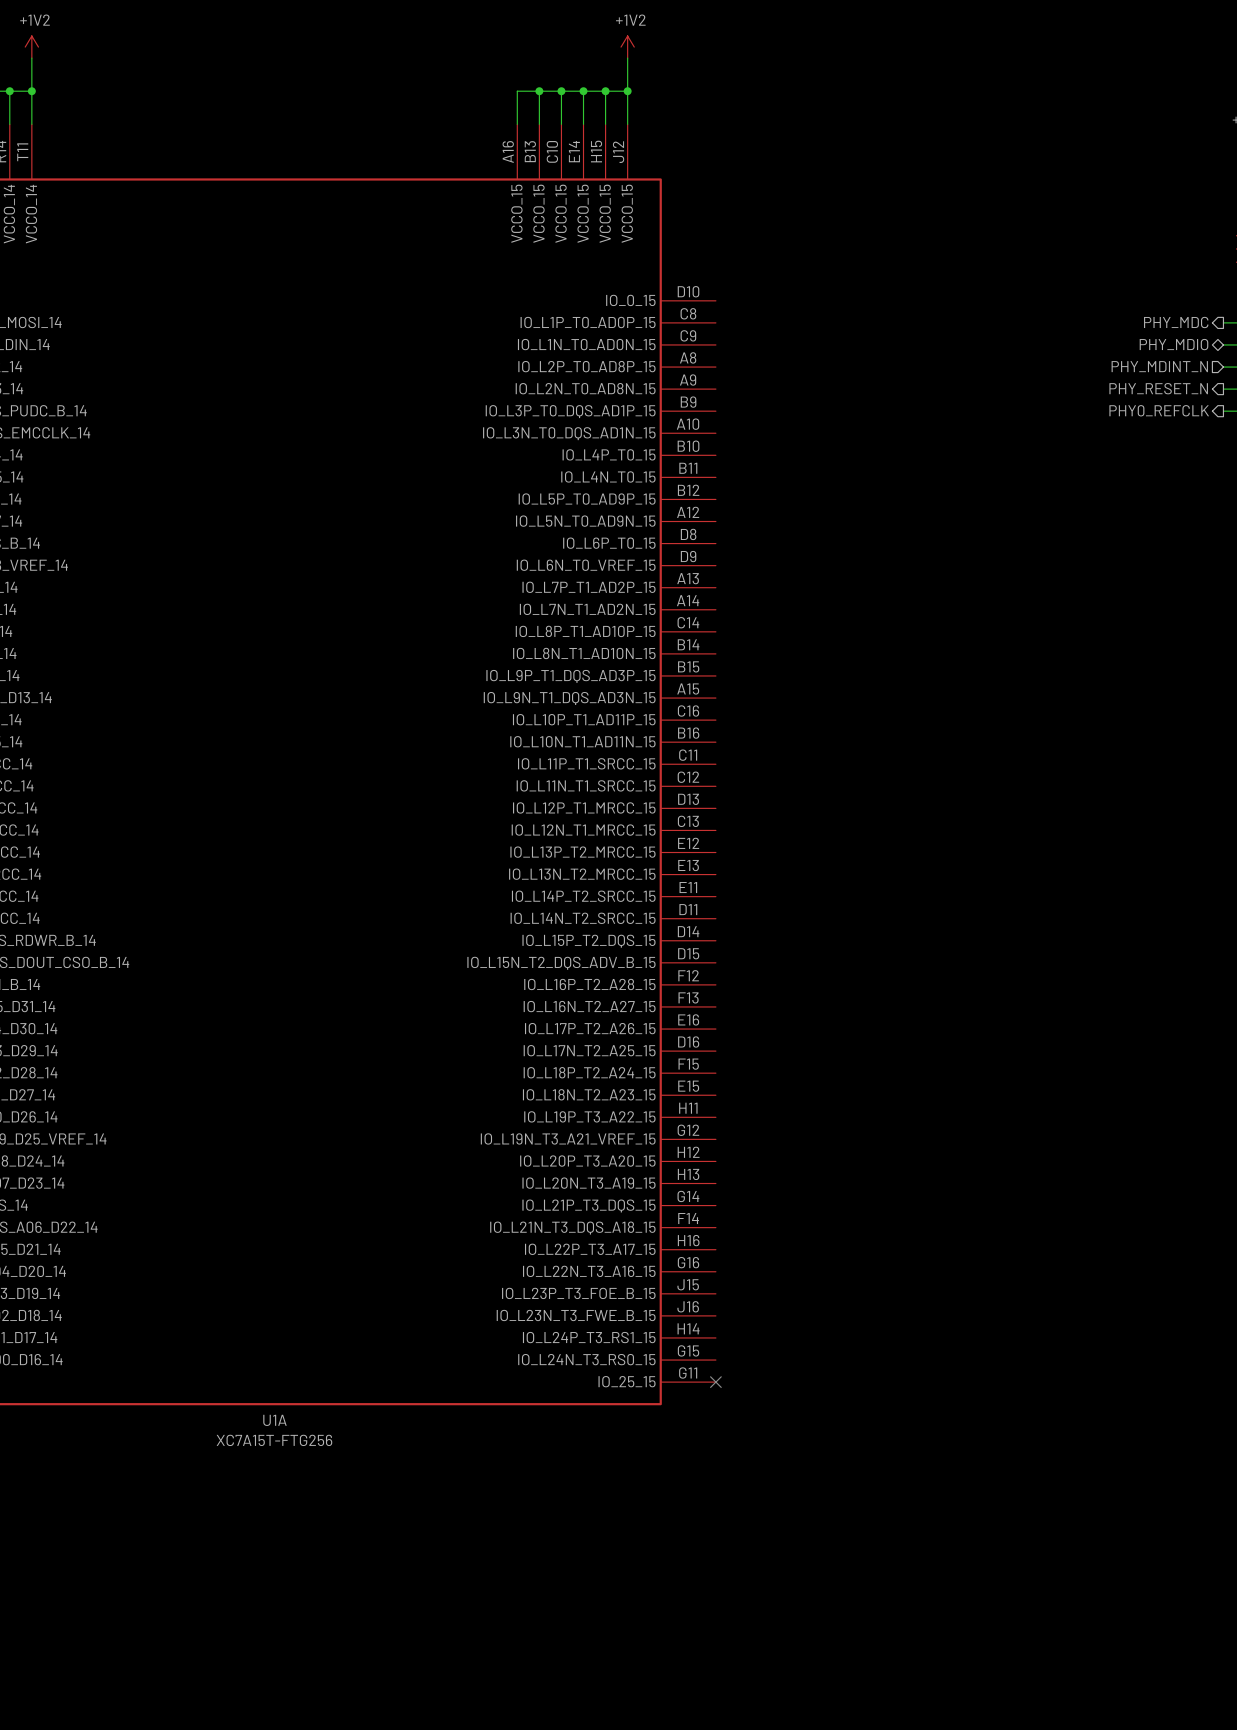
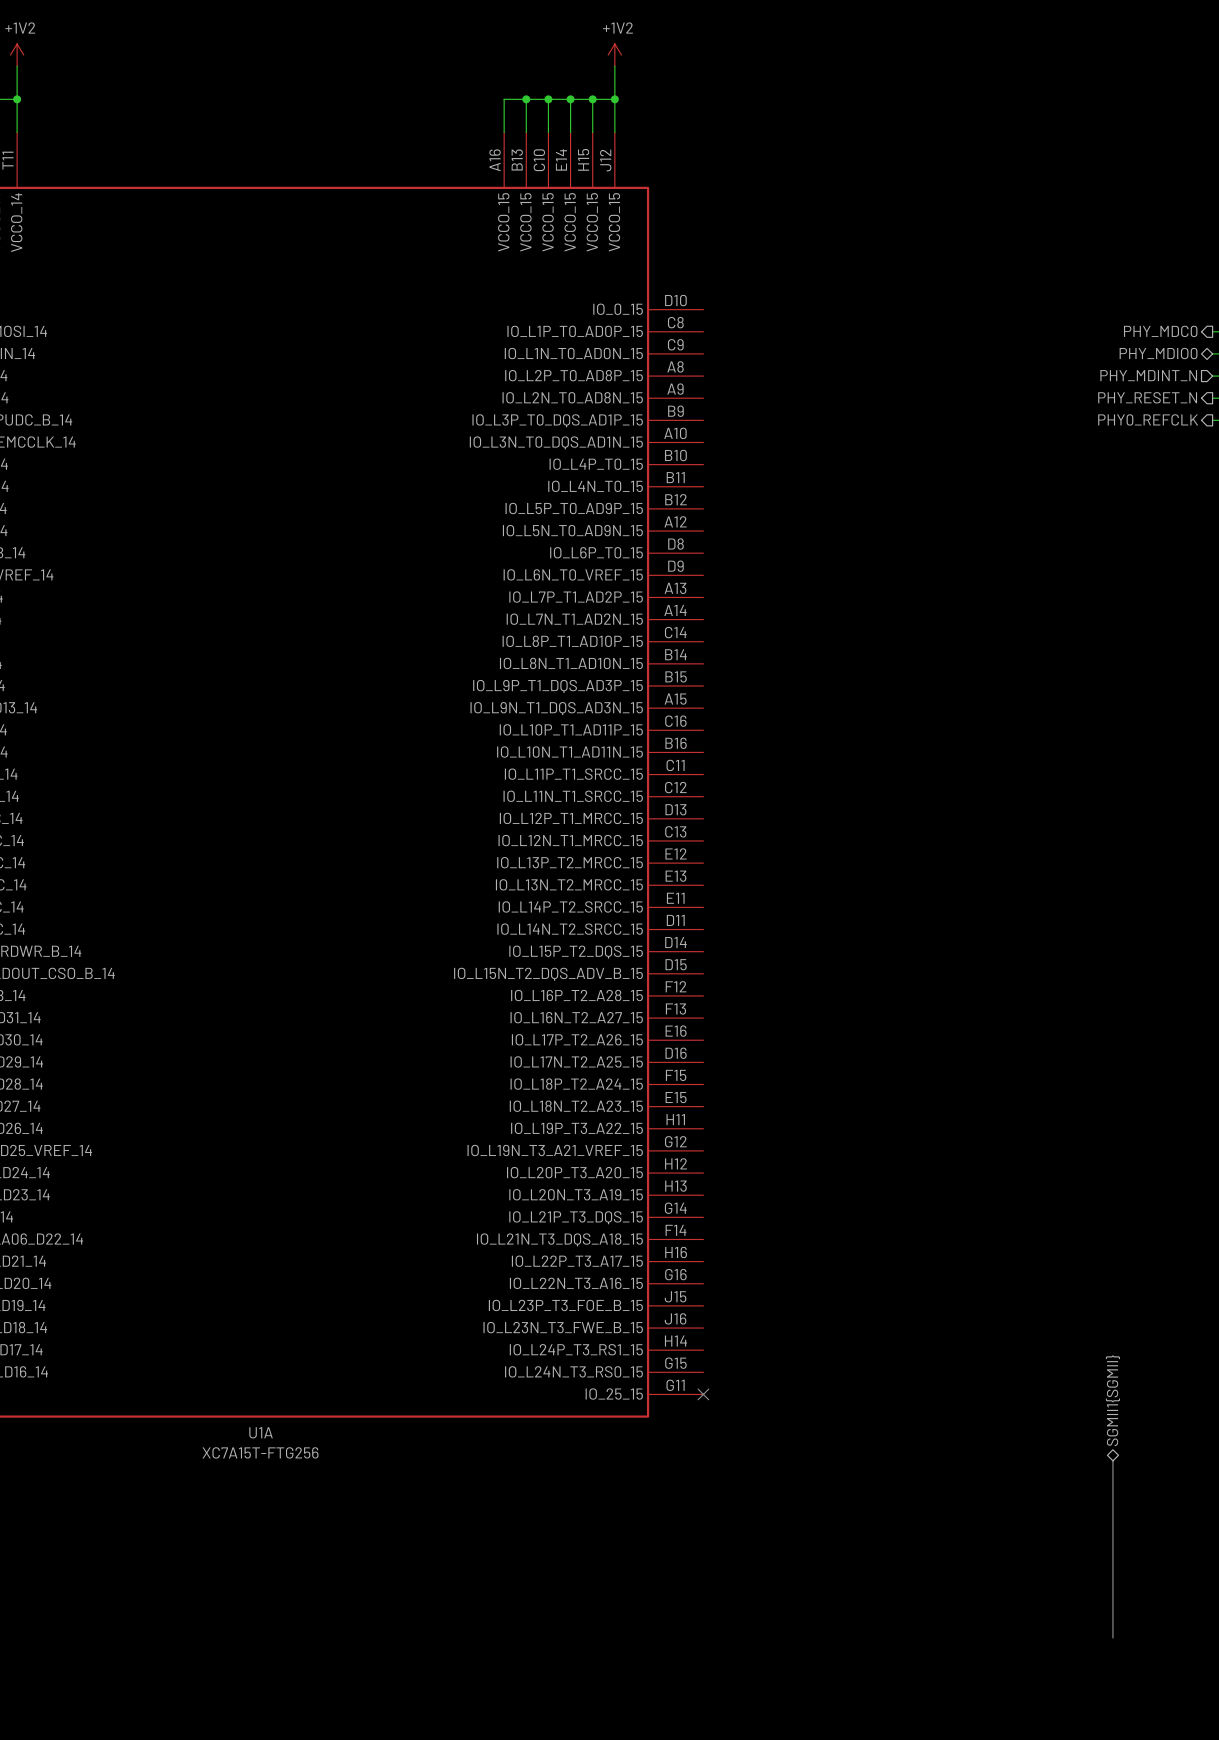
hierarchical label: PHY_MDC (1176, 322) -> PHY_MDC0 (1160, 331)
hierarchical label: PHY_MDIO (1173, 344) -> PHY_MDIO0 (1158, 353)
hierarchical label: none -> SGMII1{SGMII} (1112, 1400)
bus: none -> (1112, 1460) (1112, 1637)

